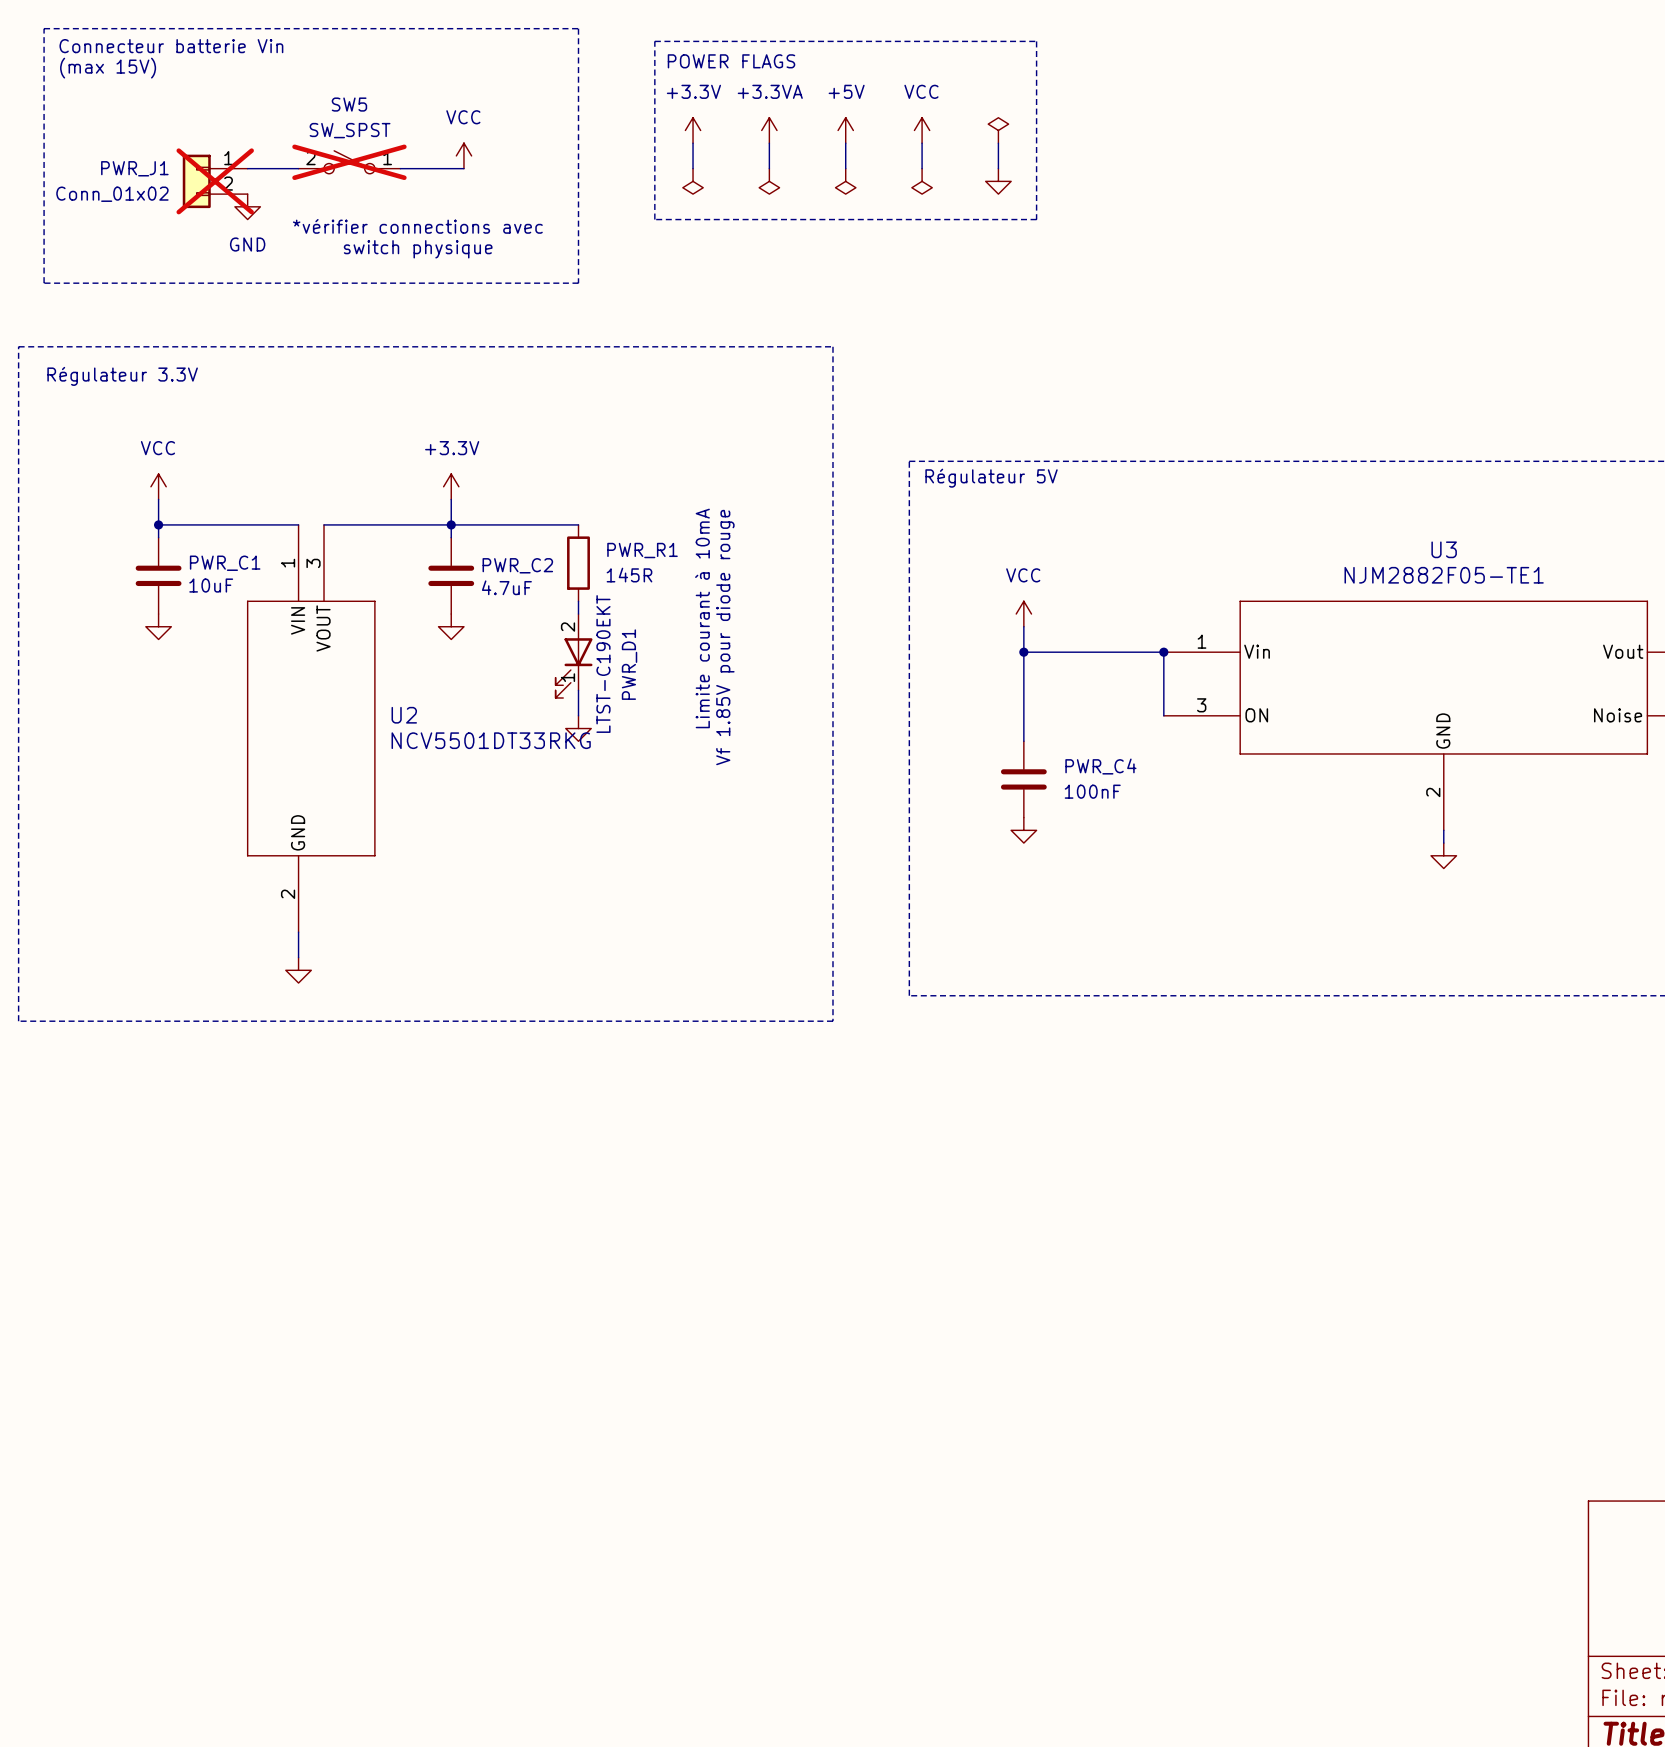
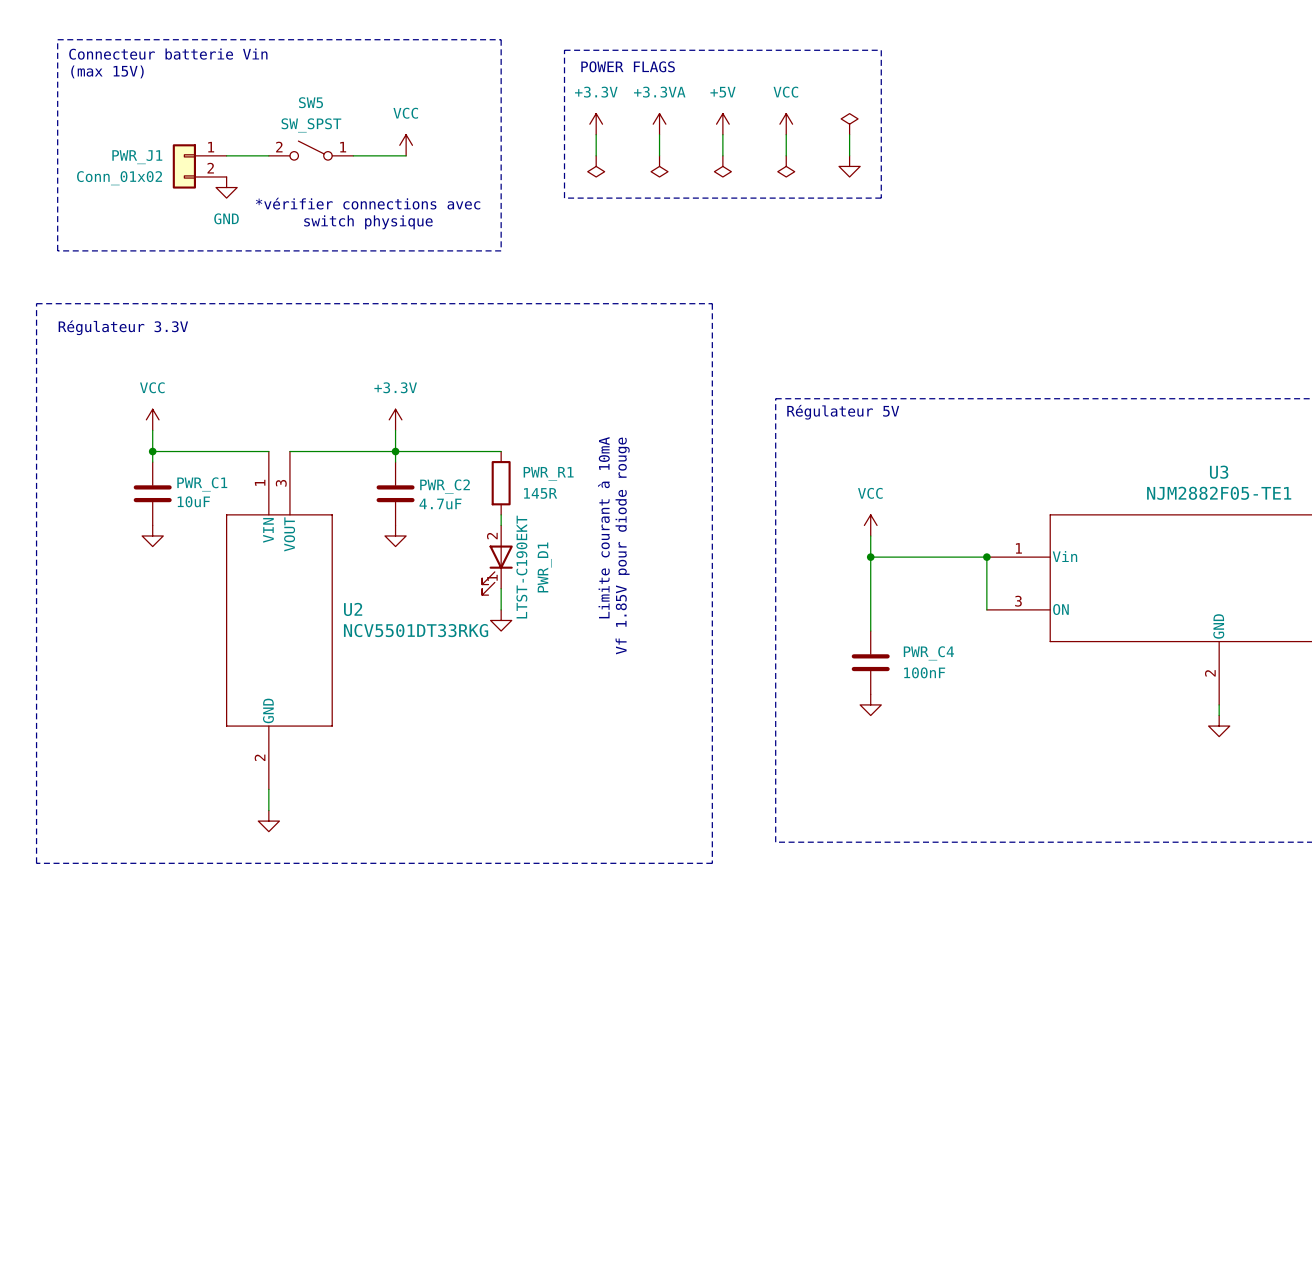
SW5 do-not-place cross: (349, 162) -> none
PWR_J1 do-not-place cross: (215, 181) -> none

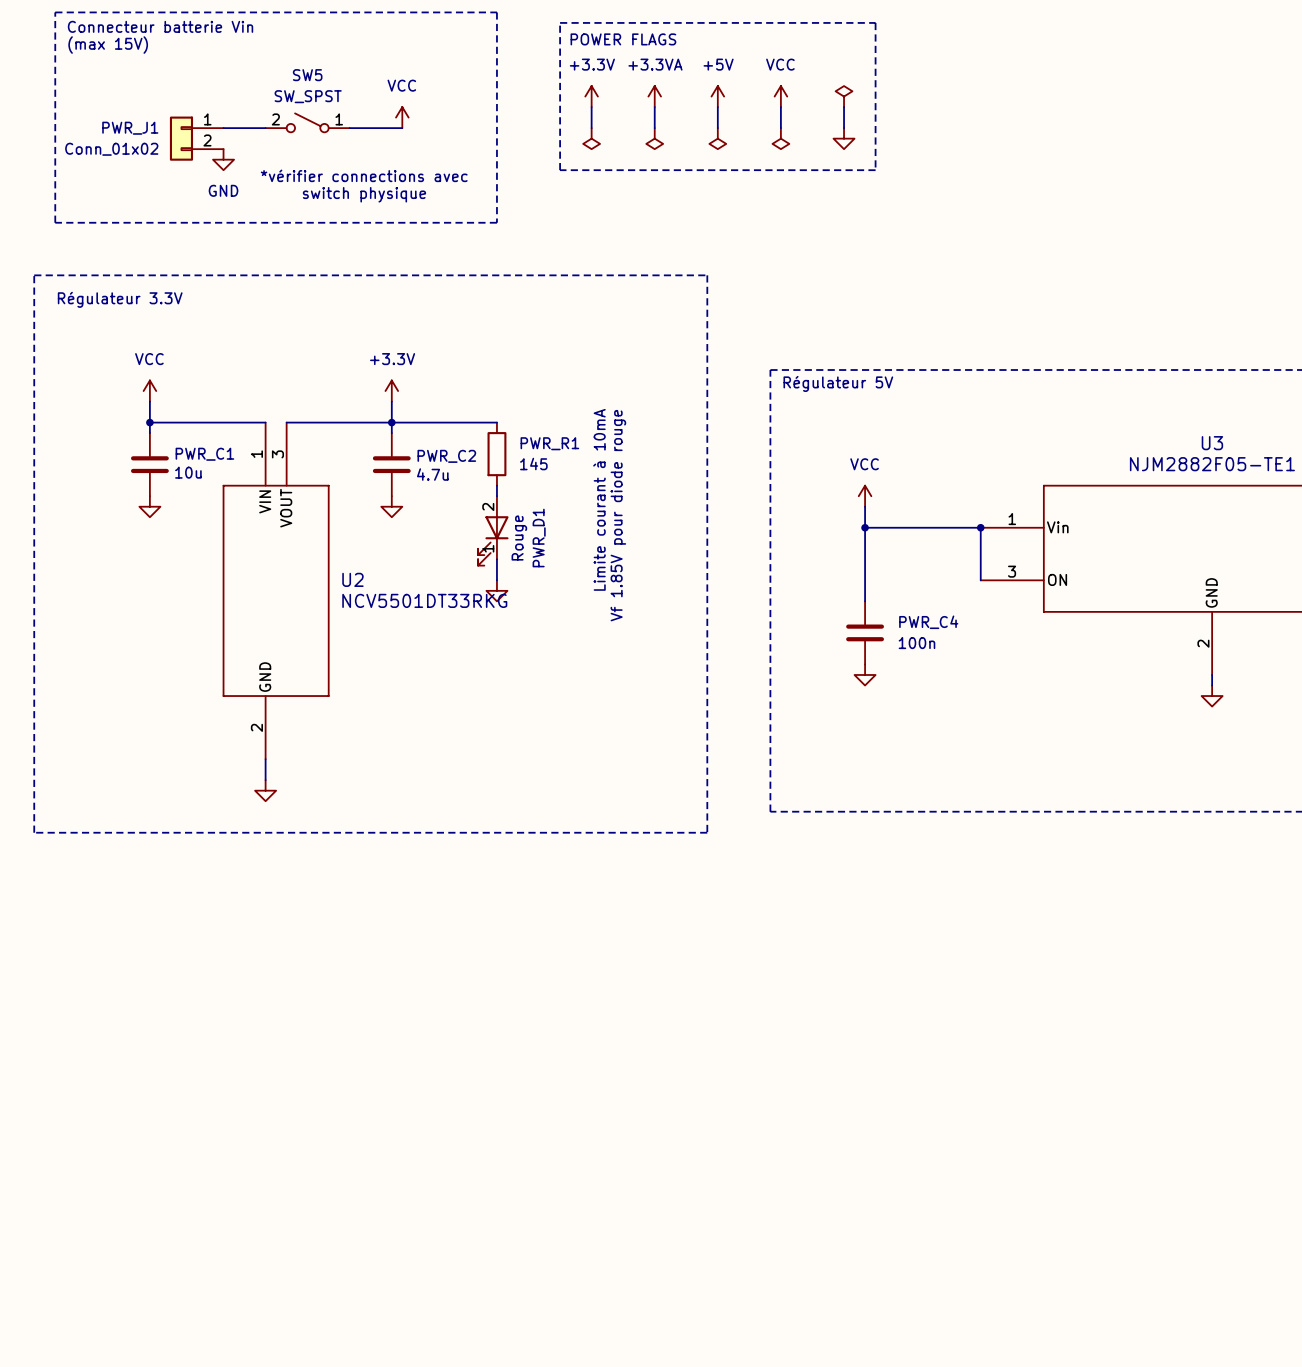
PWR_R1 value: 145R (540, 493) -> 145 (533, 464)
PWR_C1 value: 10uF (193, 501) -> 10u (188, 472)
PWR_C2 value: 4.7uF (440, 504) -> 4.7u (432, 474)
PWR_D1 value: LTST-C190EKT (521, 567) -> Rouge (519, 538)
PWR_C4 value: 100nF (924, 672) -> 100n (916, 643)

